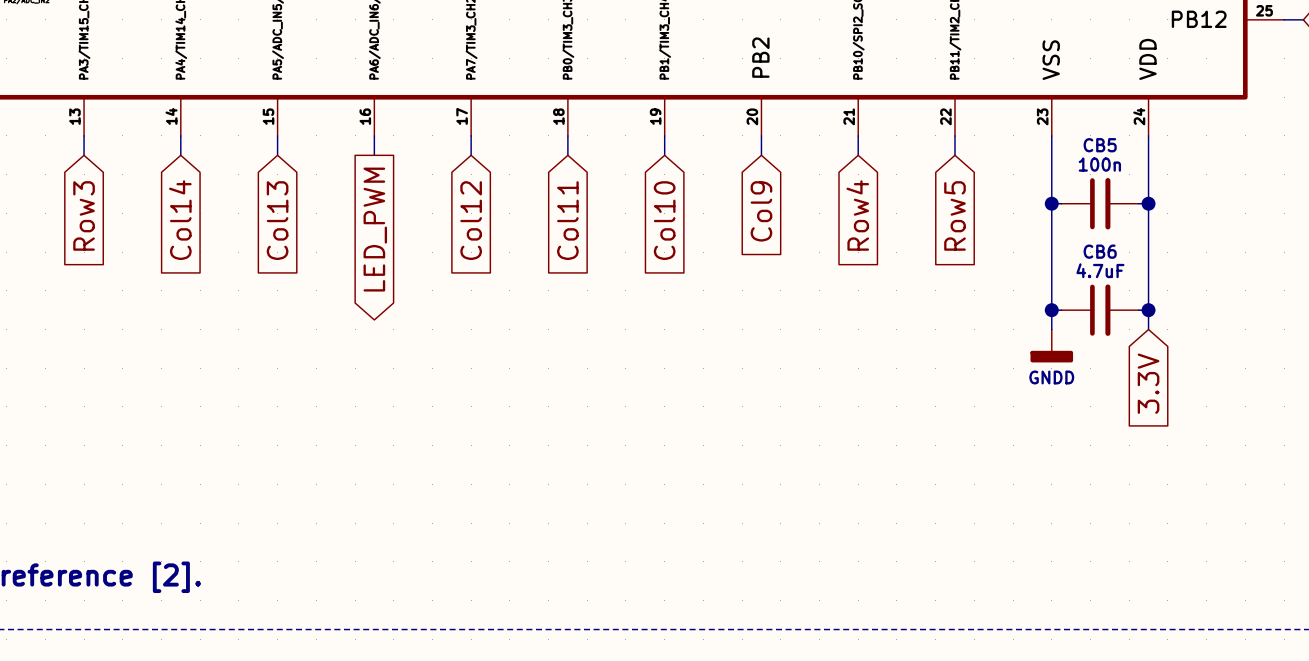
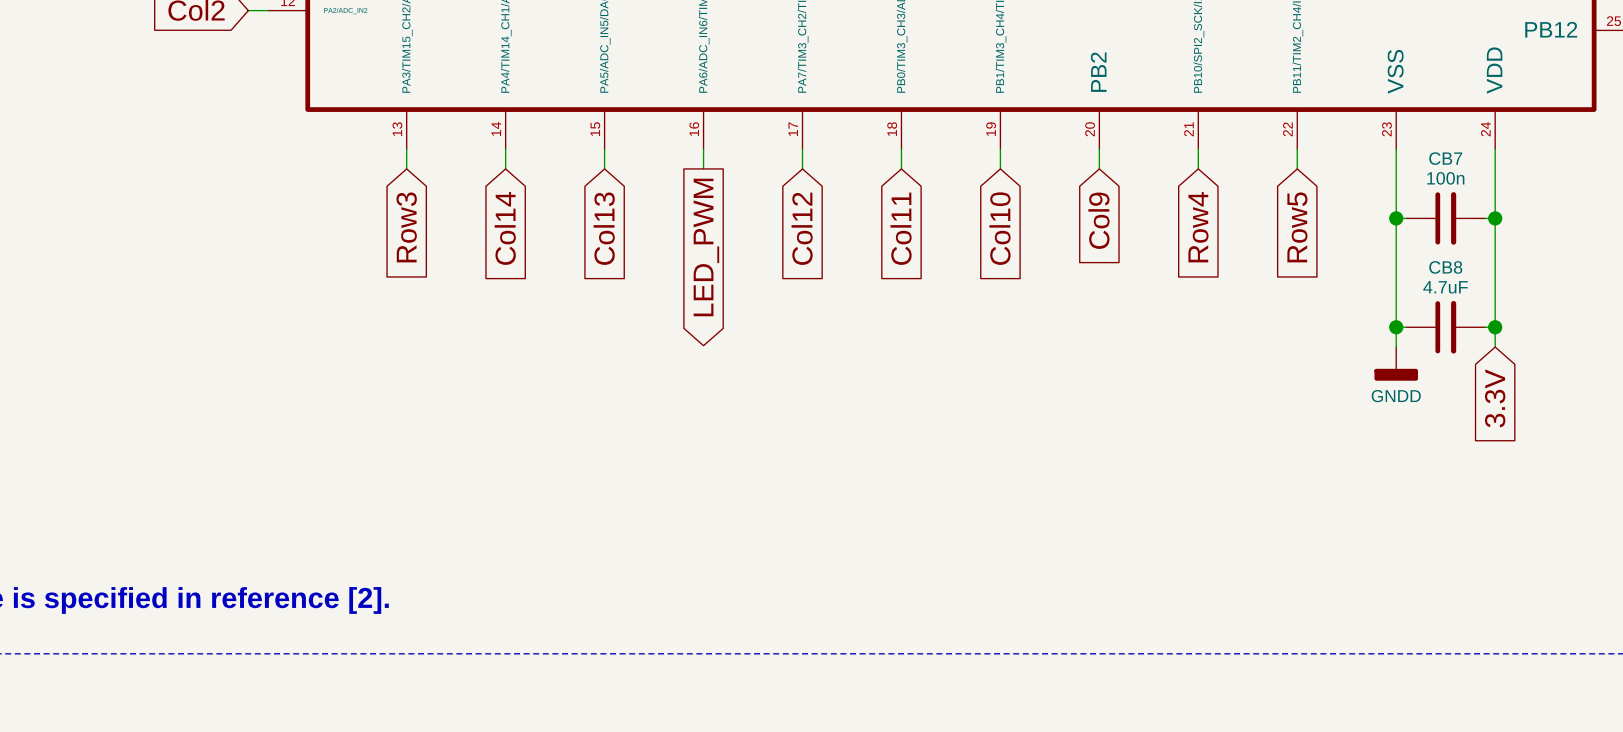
CB5 name: CB5 (1100, 145) -> CB7 (1445, 158)
CB6 name: CB6 (1100, 251) -> CB8 (1445, 267)

